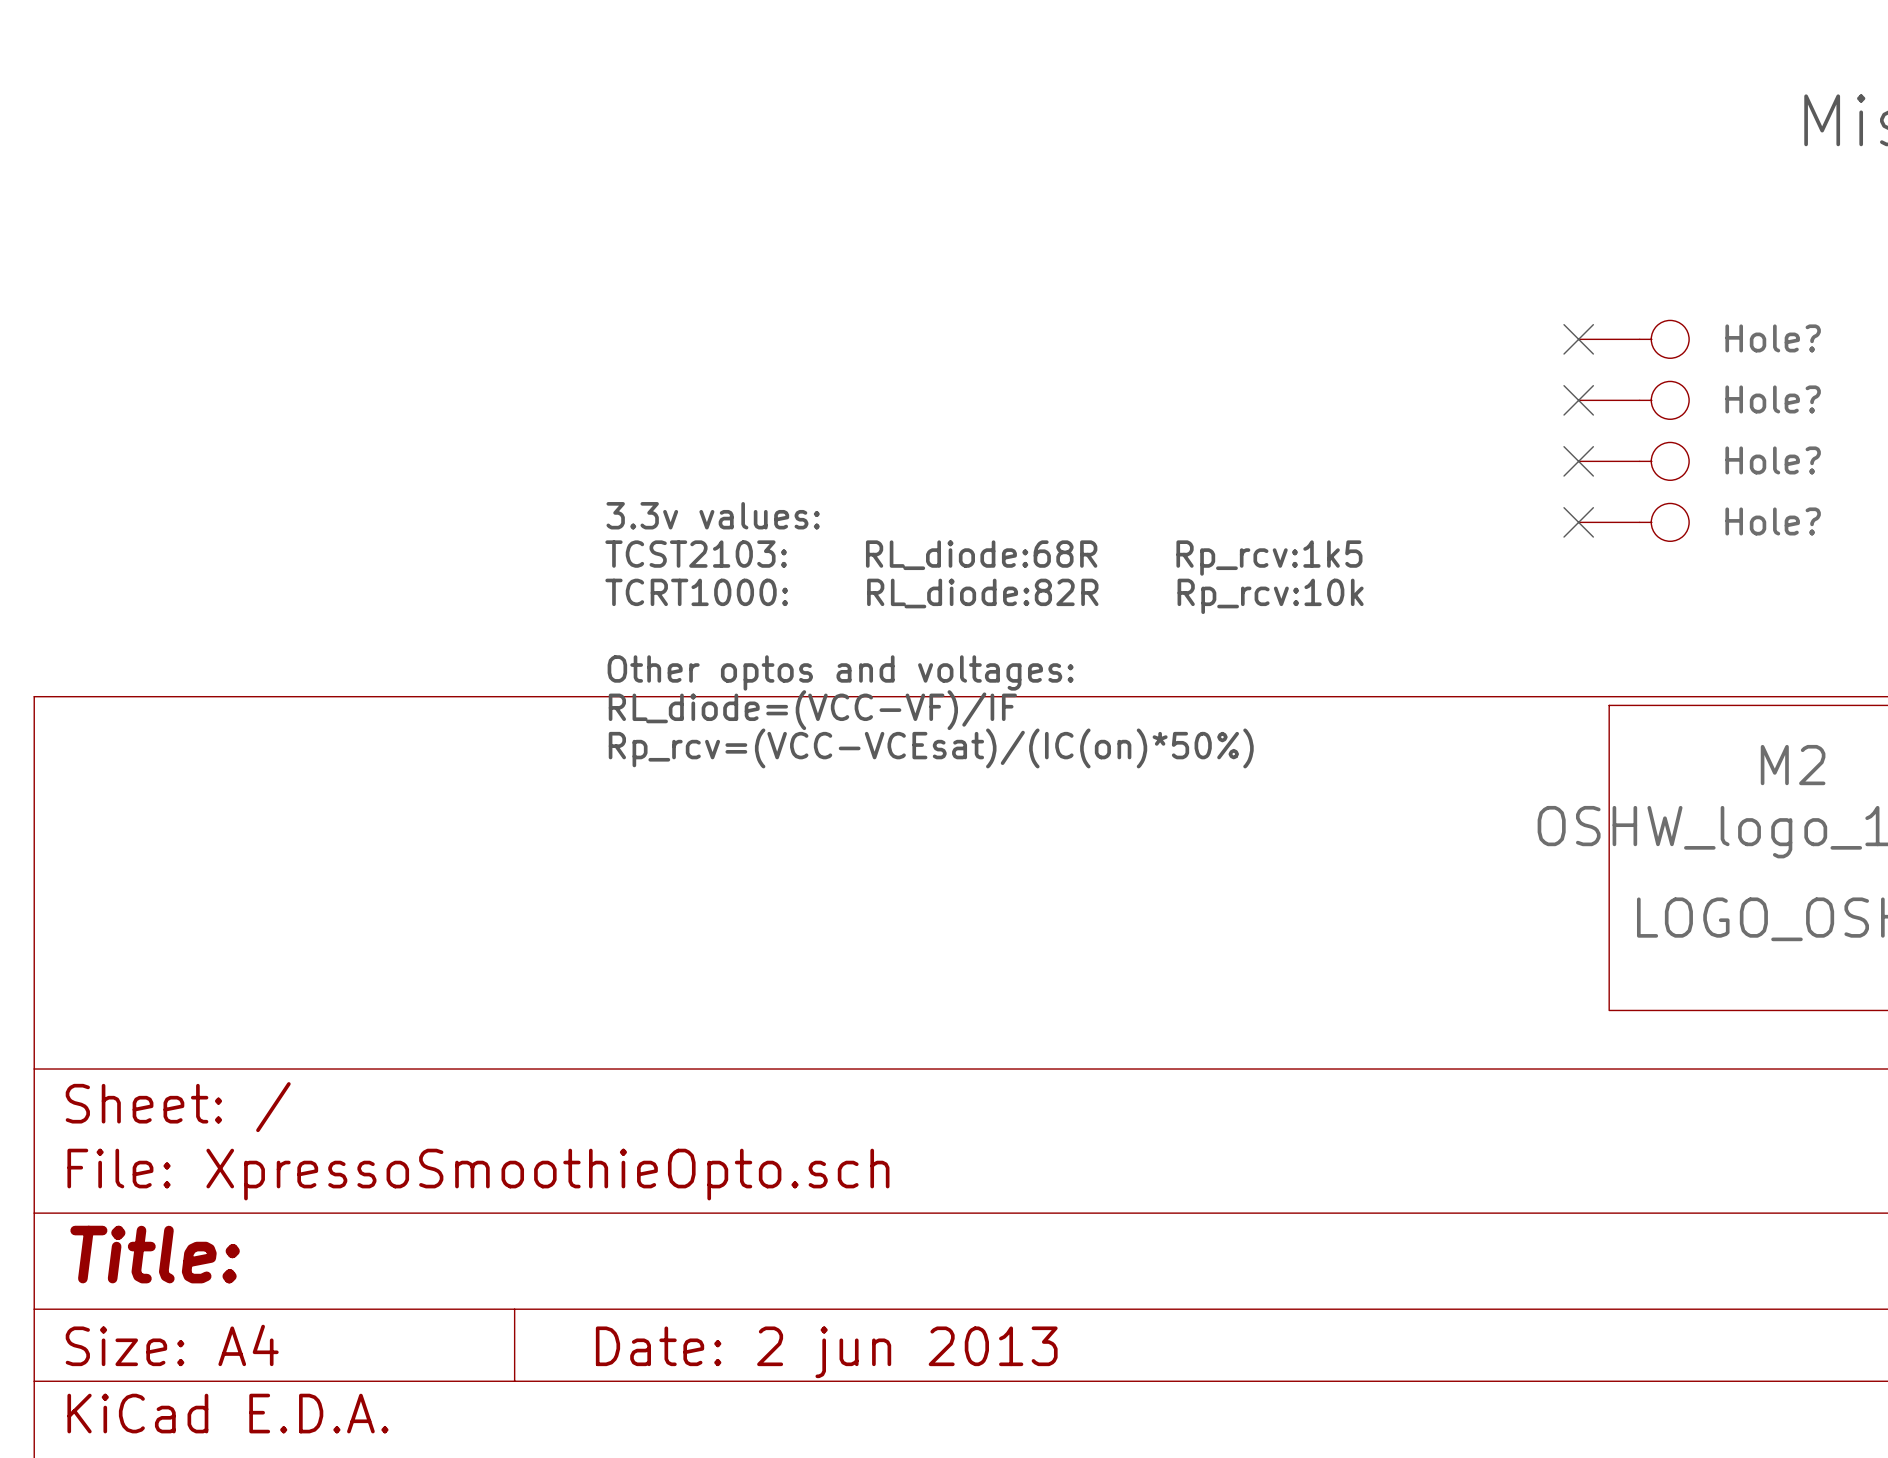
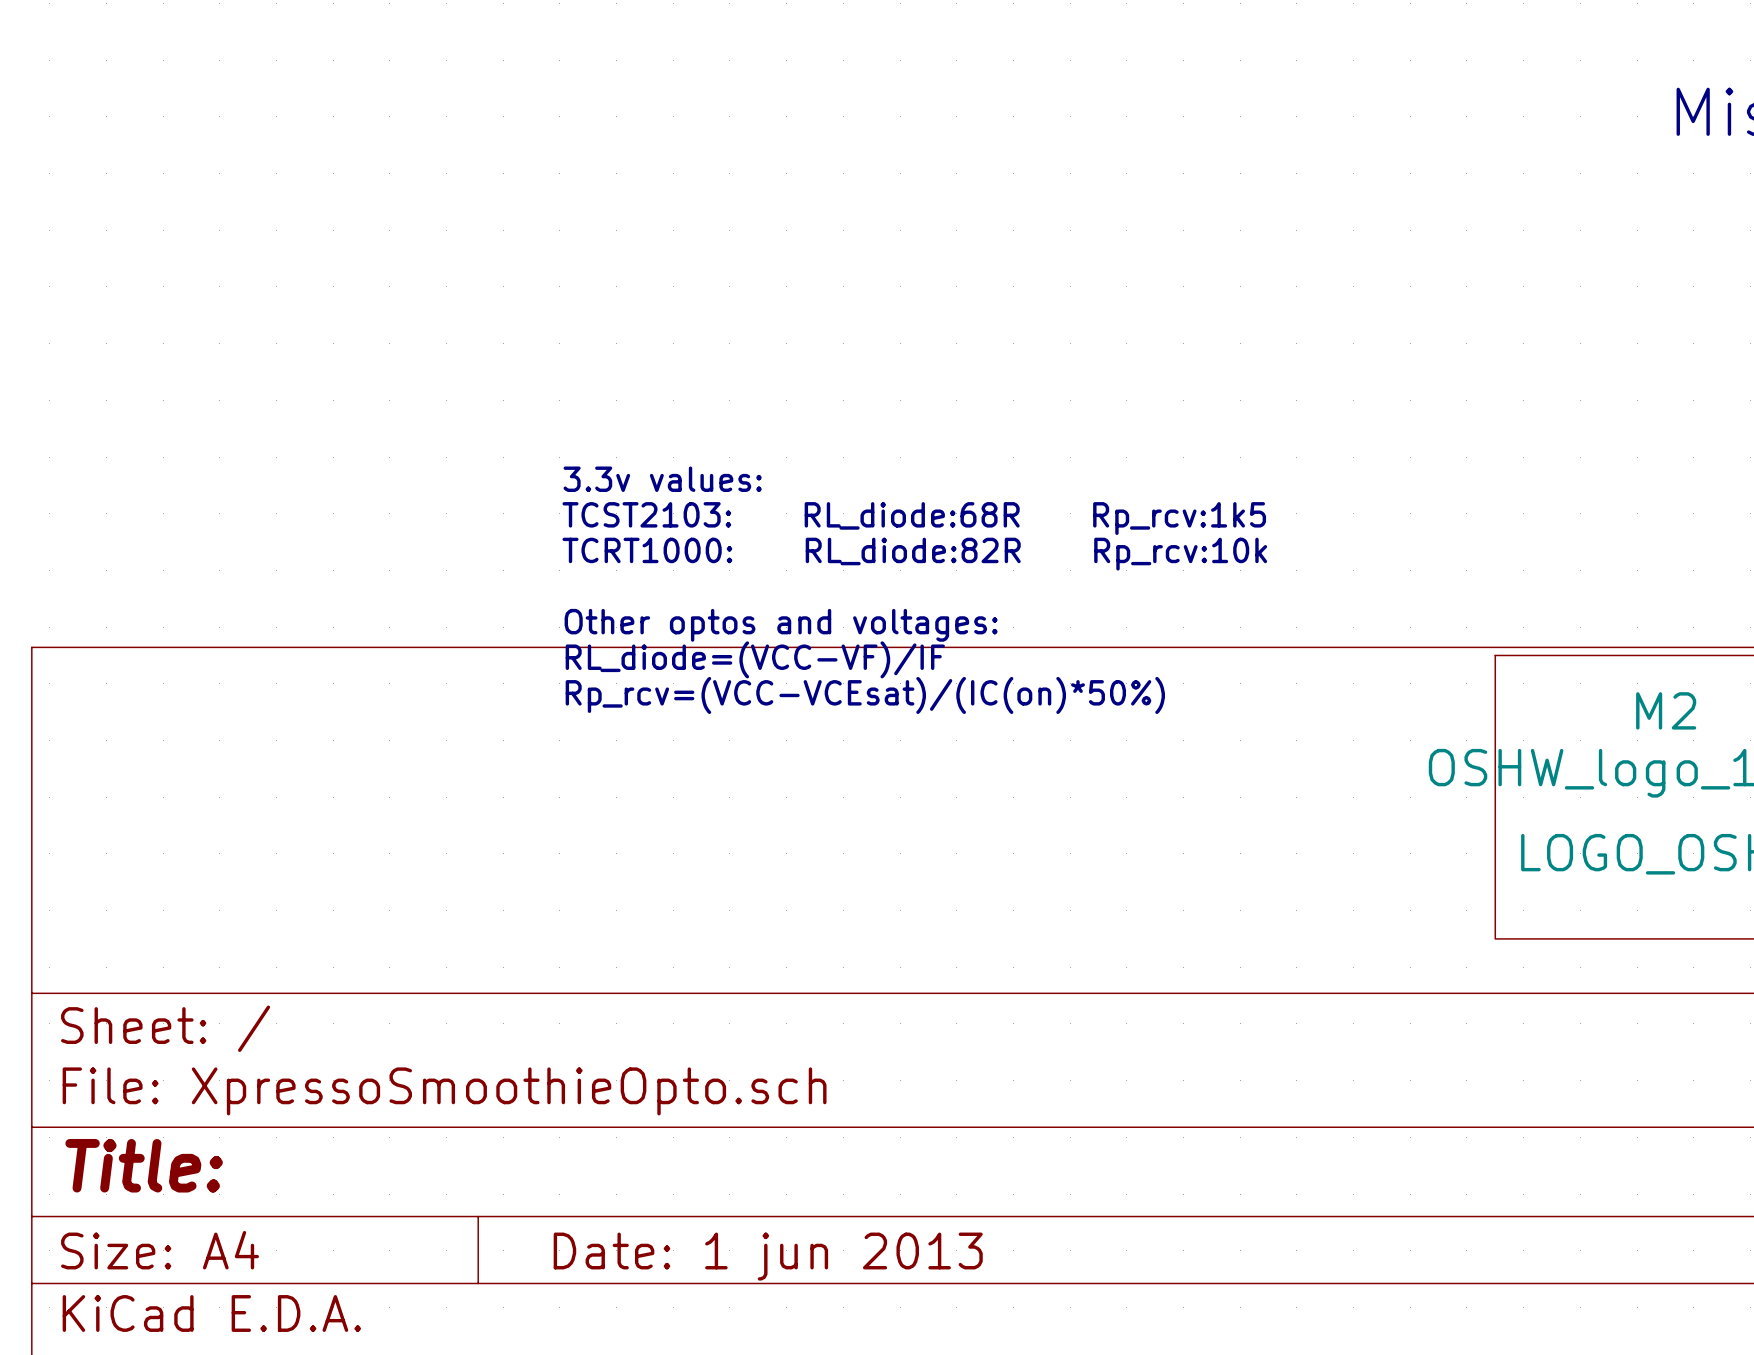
no-connect mark: (1578, 339) -> none
Hole?: (1633, 339) -> none
no-connect mark: (1578, 400) -> none
Hole?: (1633, 400) -> none
no-connect mark: (1578, 461) -> none
Hole?: (1633, 461) -> none
no-connect mark: (1578, 522) -> none
Hole?: (1633, 522) -> none
title block: Date: 2 jun 2013 (826, 1352) -> Date: 1 jun 2013 (768, 1256)

